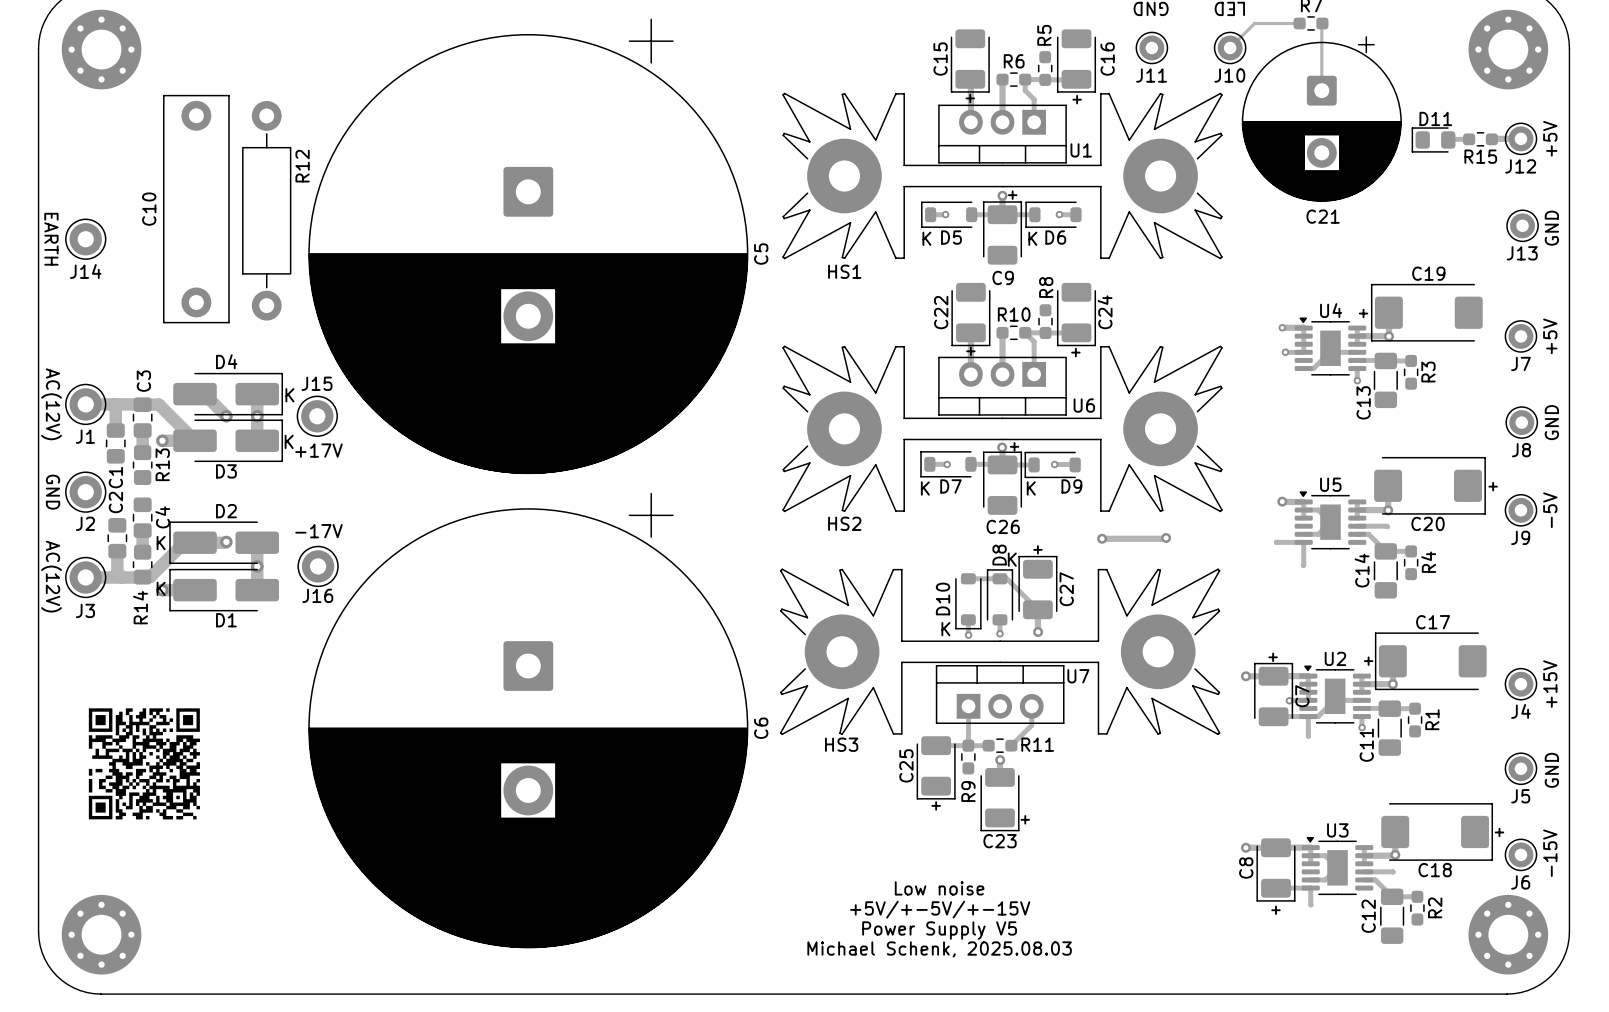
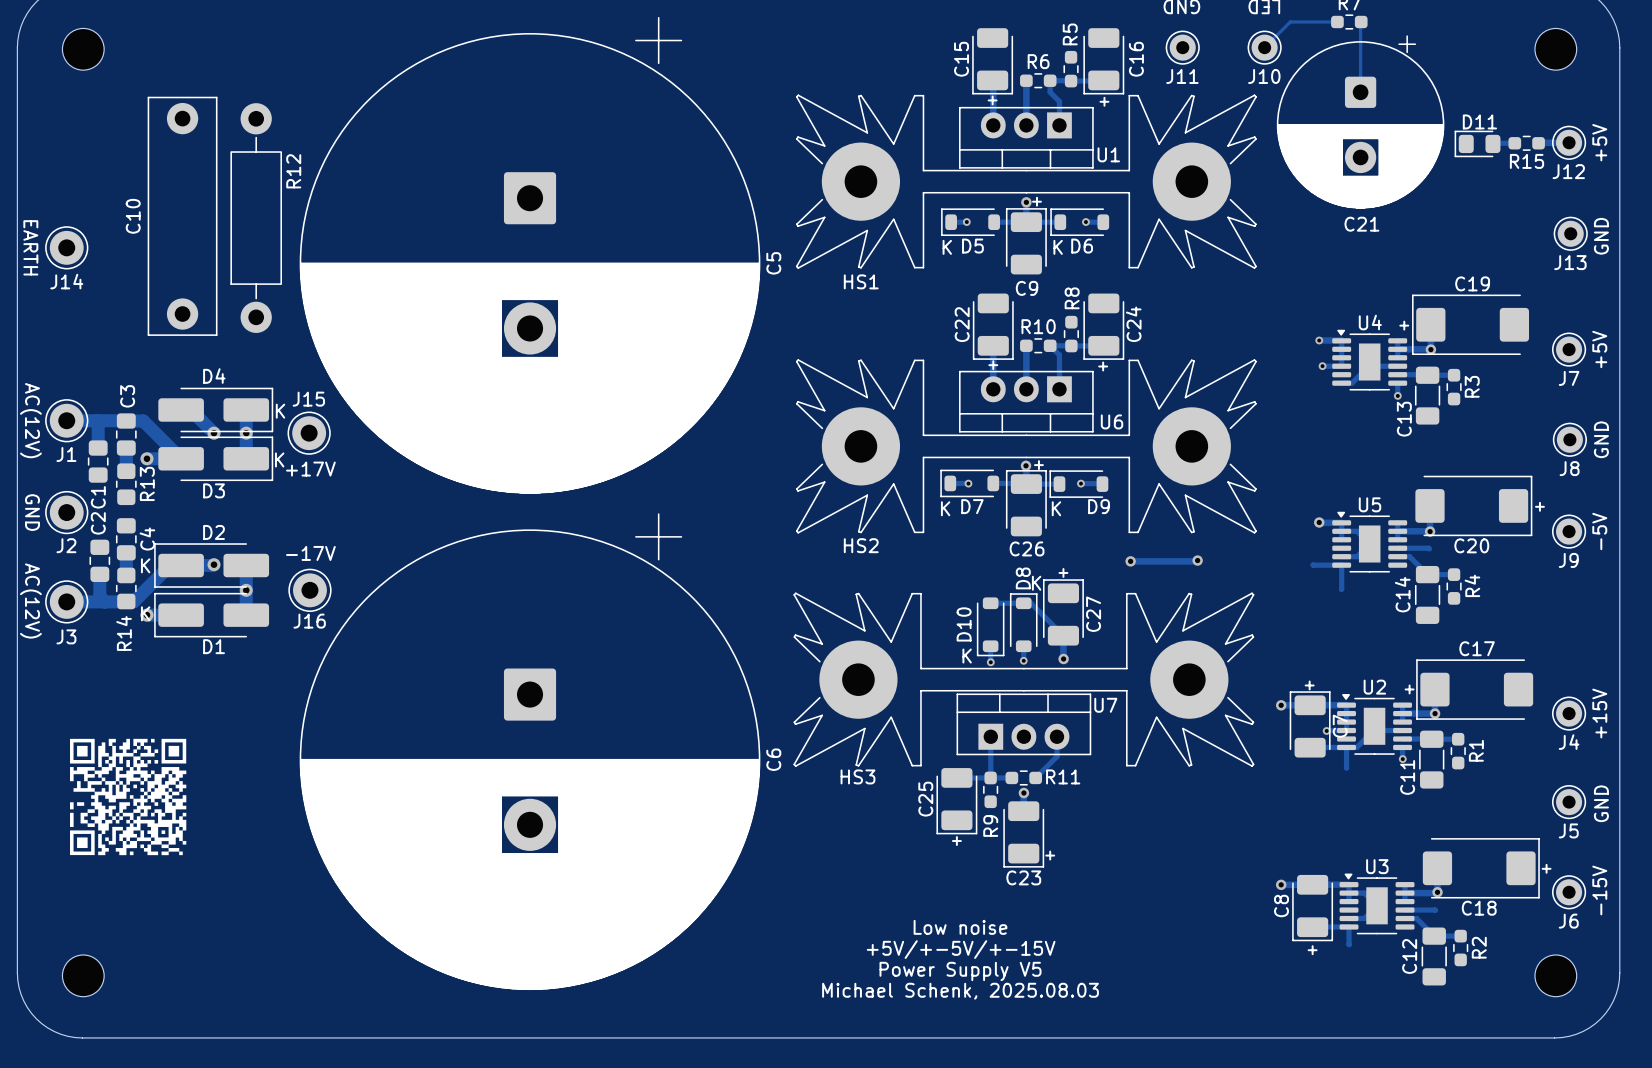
part footprint: [61, 9, 142, 90] -> [62, 28, 105, 71]
part footprint: [1468, 9, 1549, 90] -> [1534, 28, 1577, 71]
part footprint: [61, 894, 142, 975] -> [62, 954, 105, 997]
part footprint: [1468, 894, 1549, 975] -> [1534, 954, 1577, 997]

